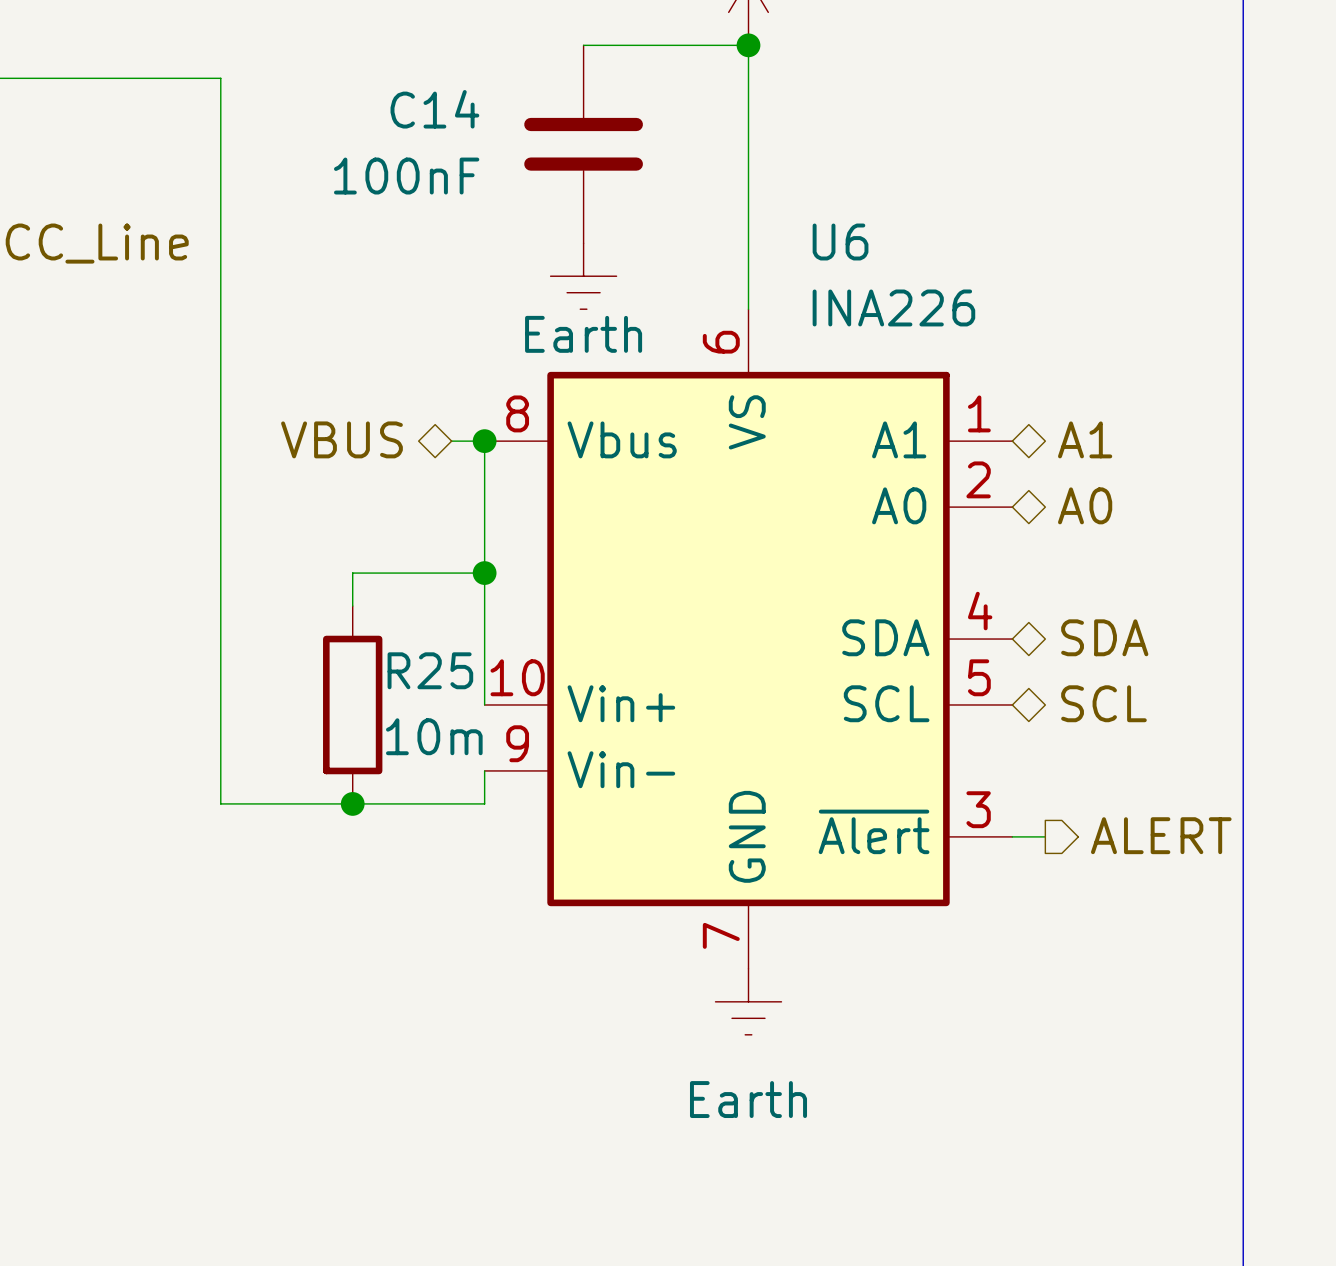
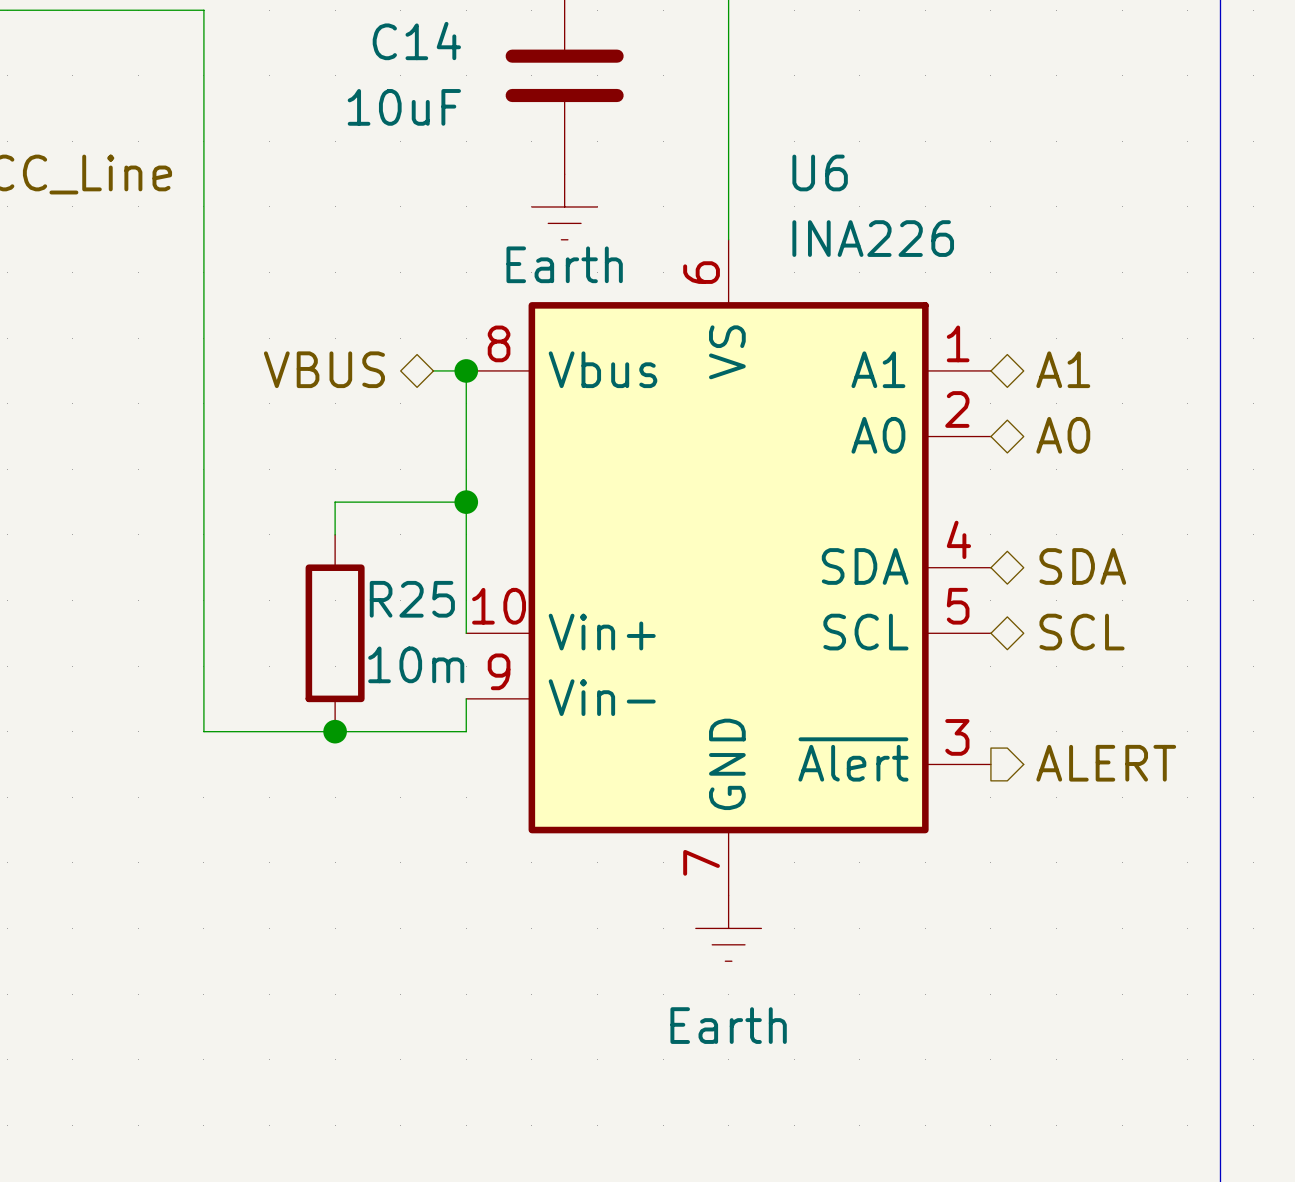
C14 value: 100nF (406, 176) -> 10uF (404, 107)
hierarchical label position: ALERT (1161, 835) -> ALERT (1106, 763)
wire: (1012, 836) (1045, 836) -> none

